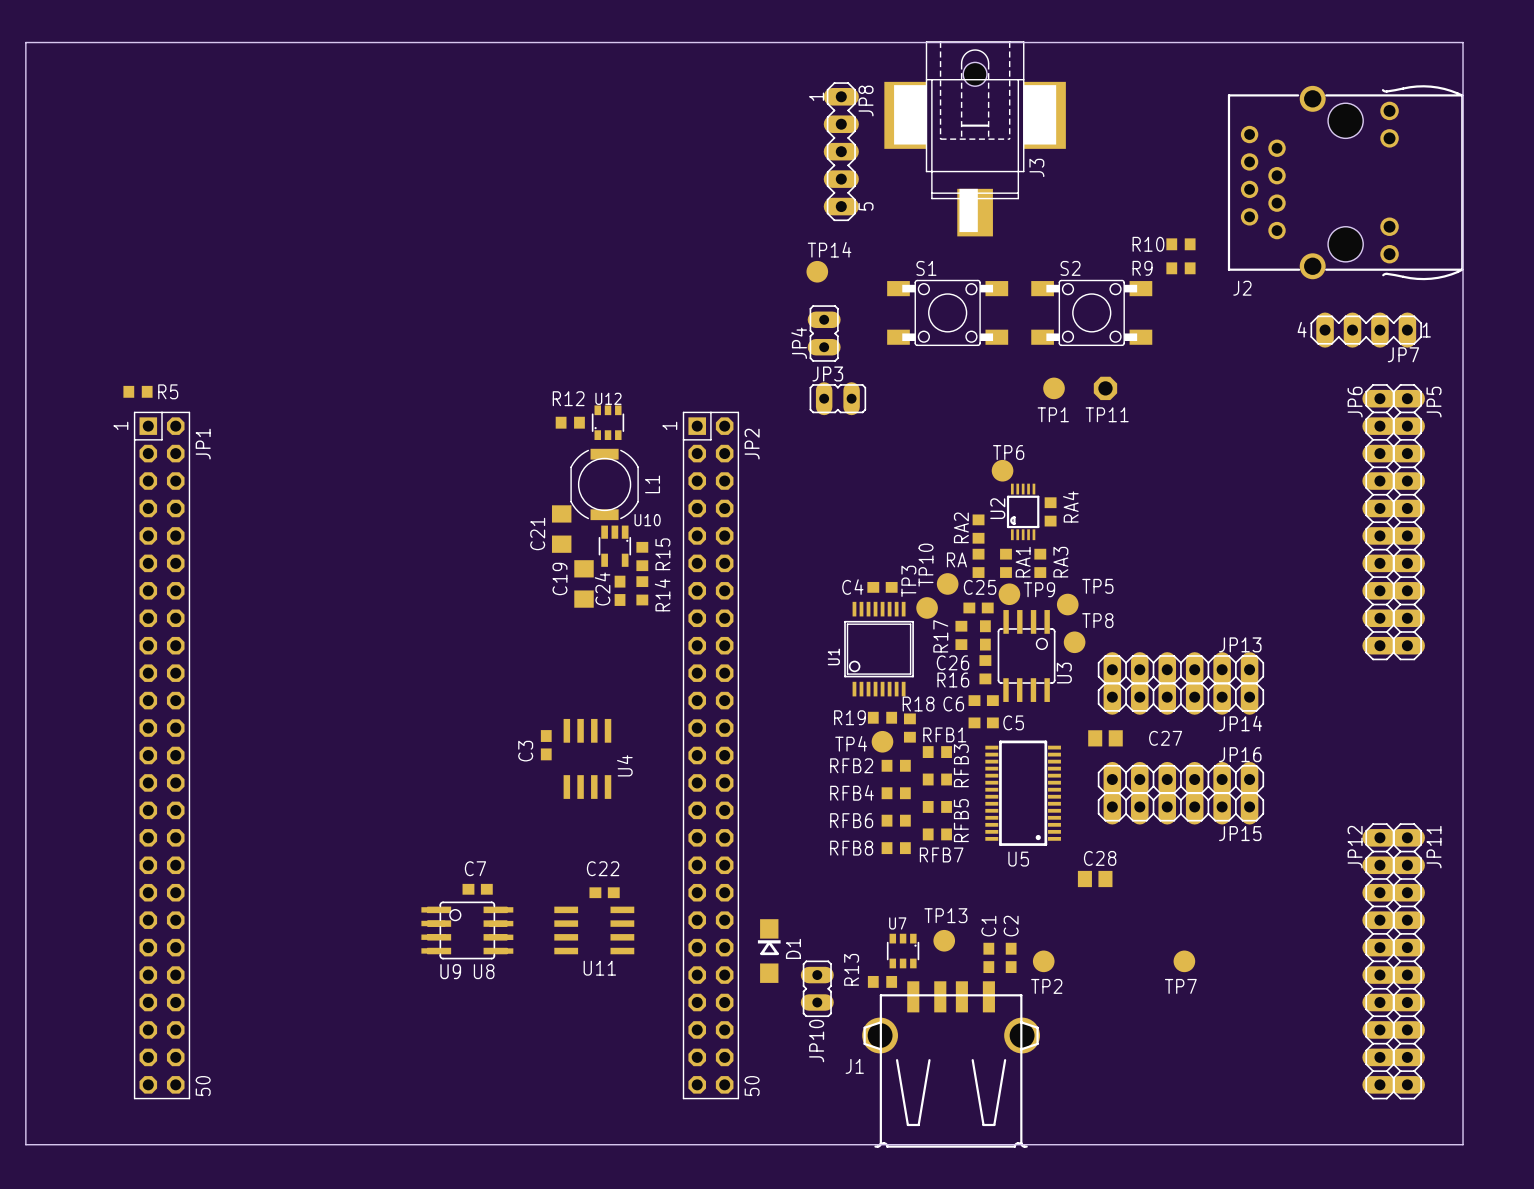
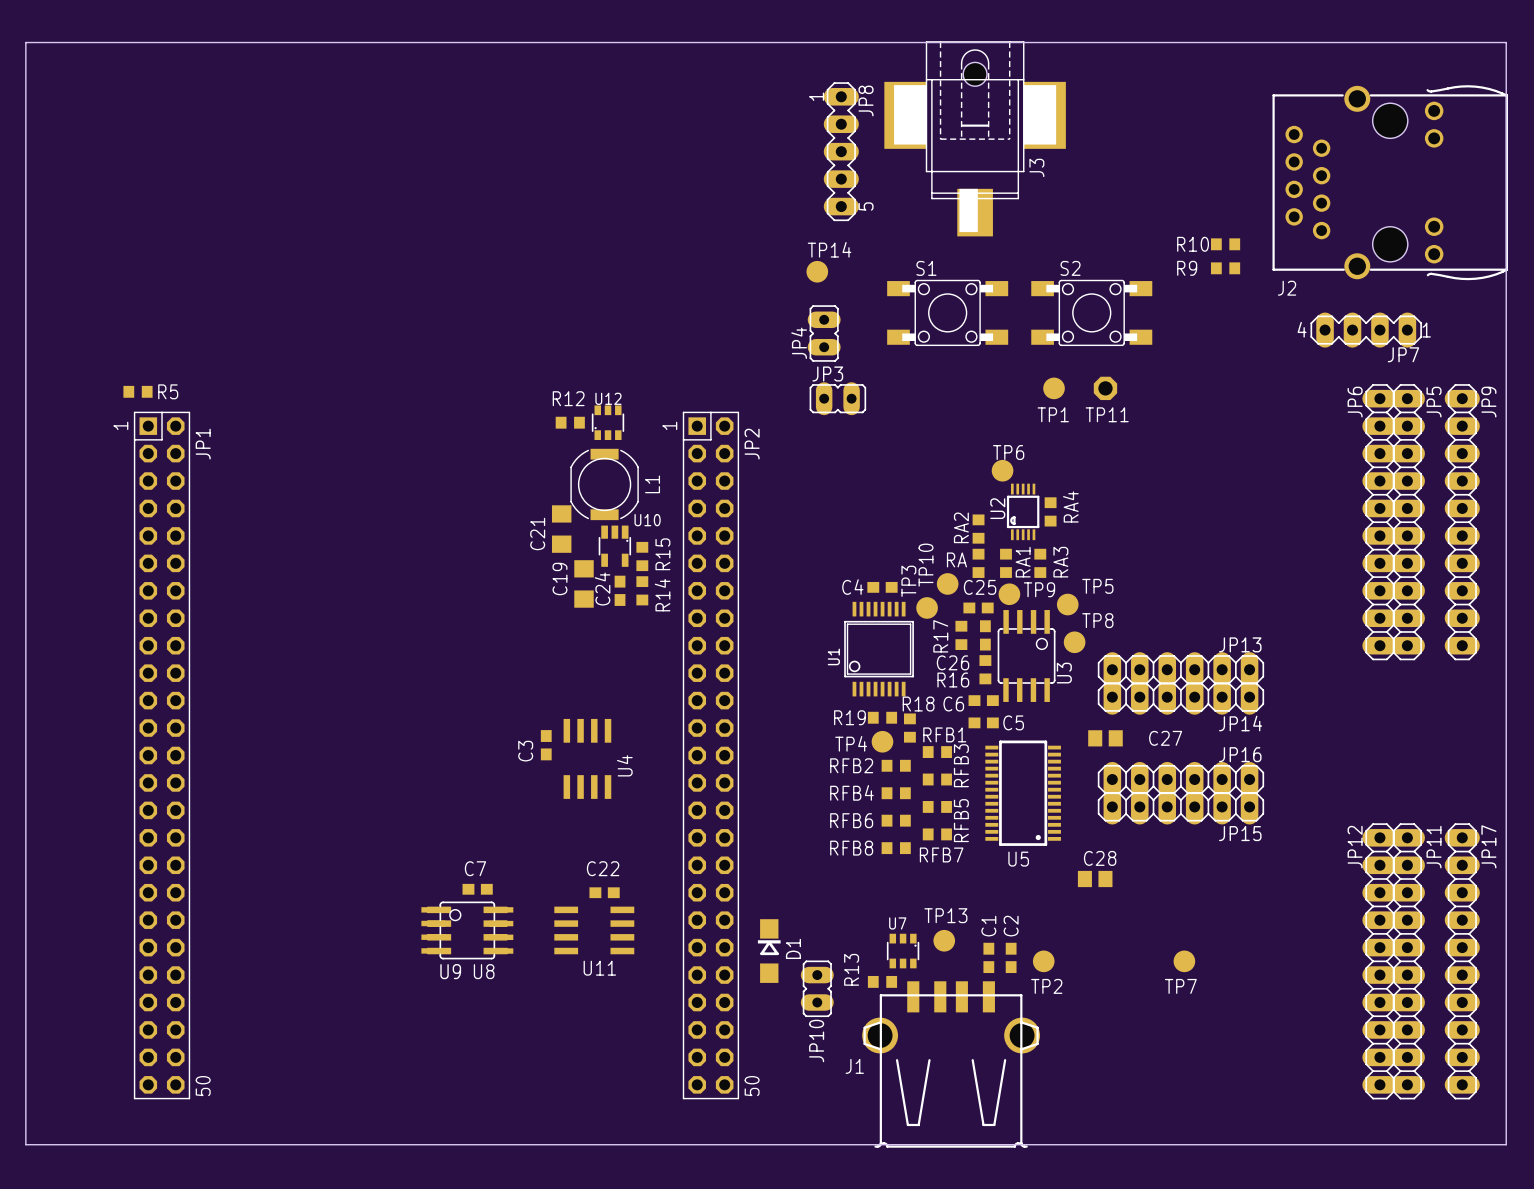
board edge: (1463, 42) (1463, 1144) -> (1463, 42) (1506, 42) (1506, 1144) (1463, 1144)
J2 position: (1345, 182) -> (1390, 182)
R10 position: (1180, 244) -> (1225, 244)
R9 position: (1180, 268) -> (1225, 268)
JP9: none -> (1462, 522)
JP17: none -> (1462, 961)

